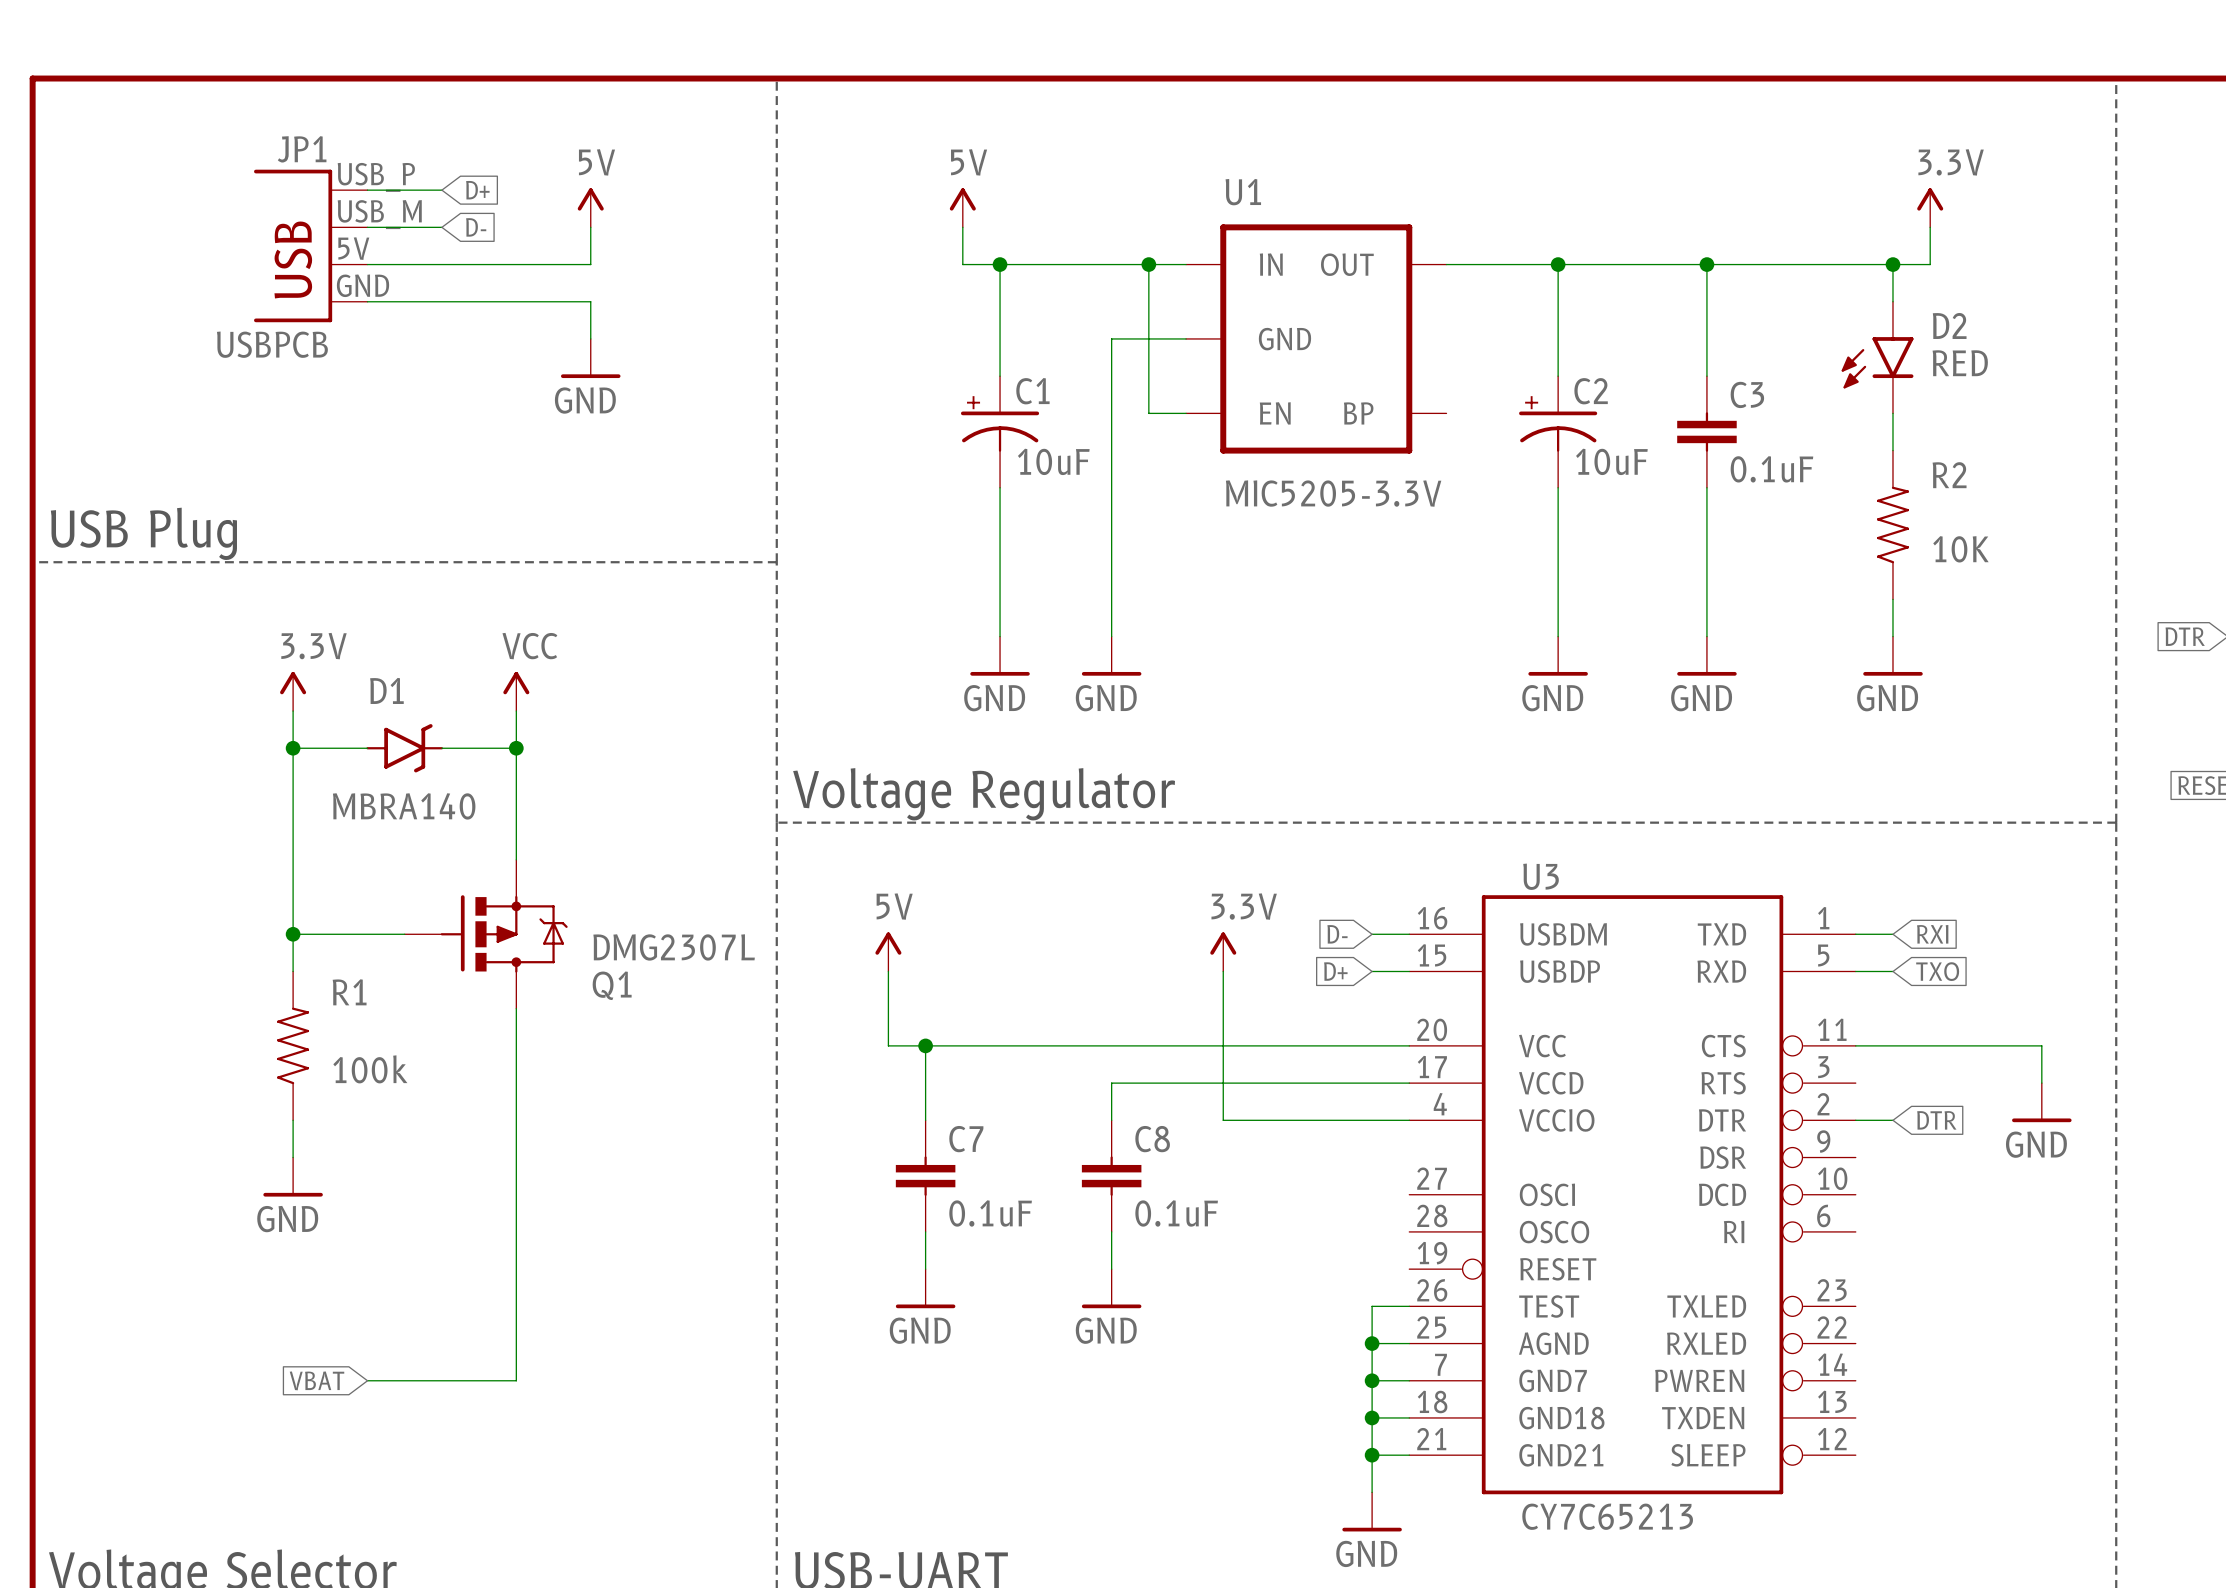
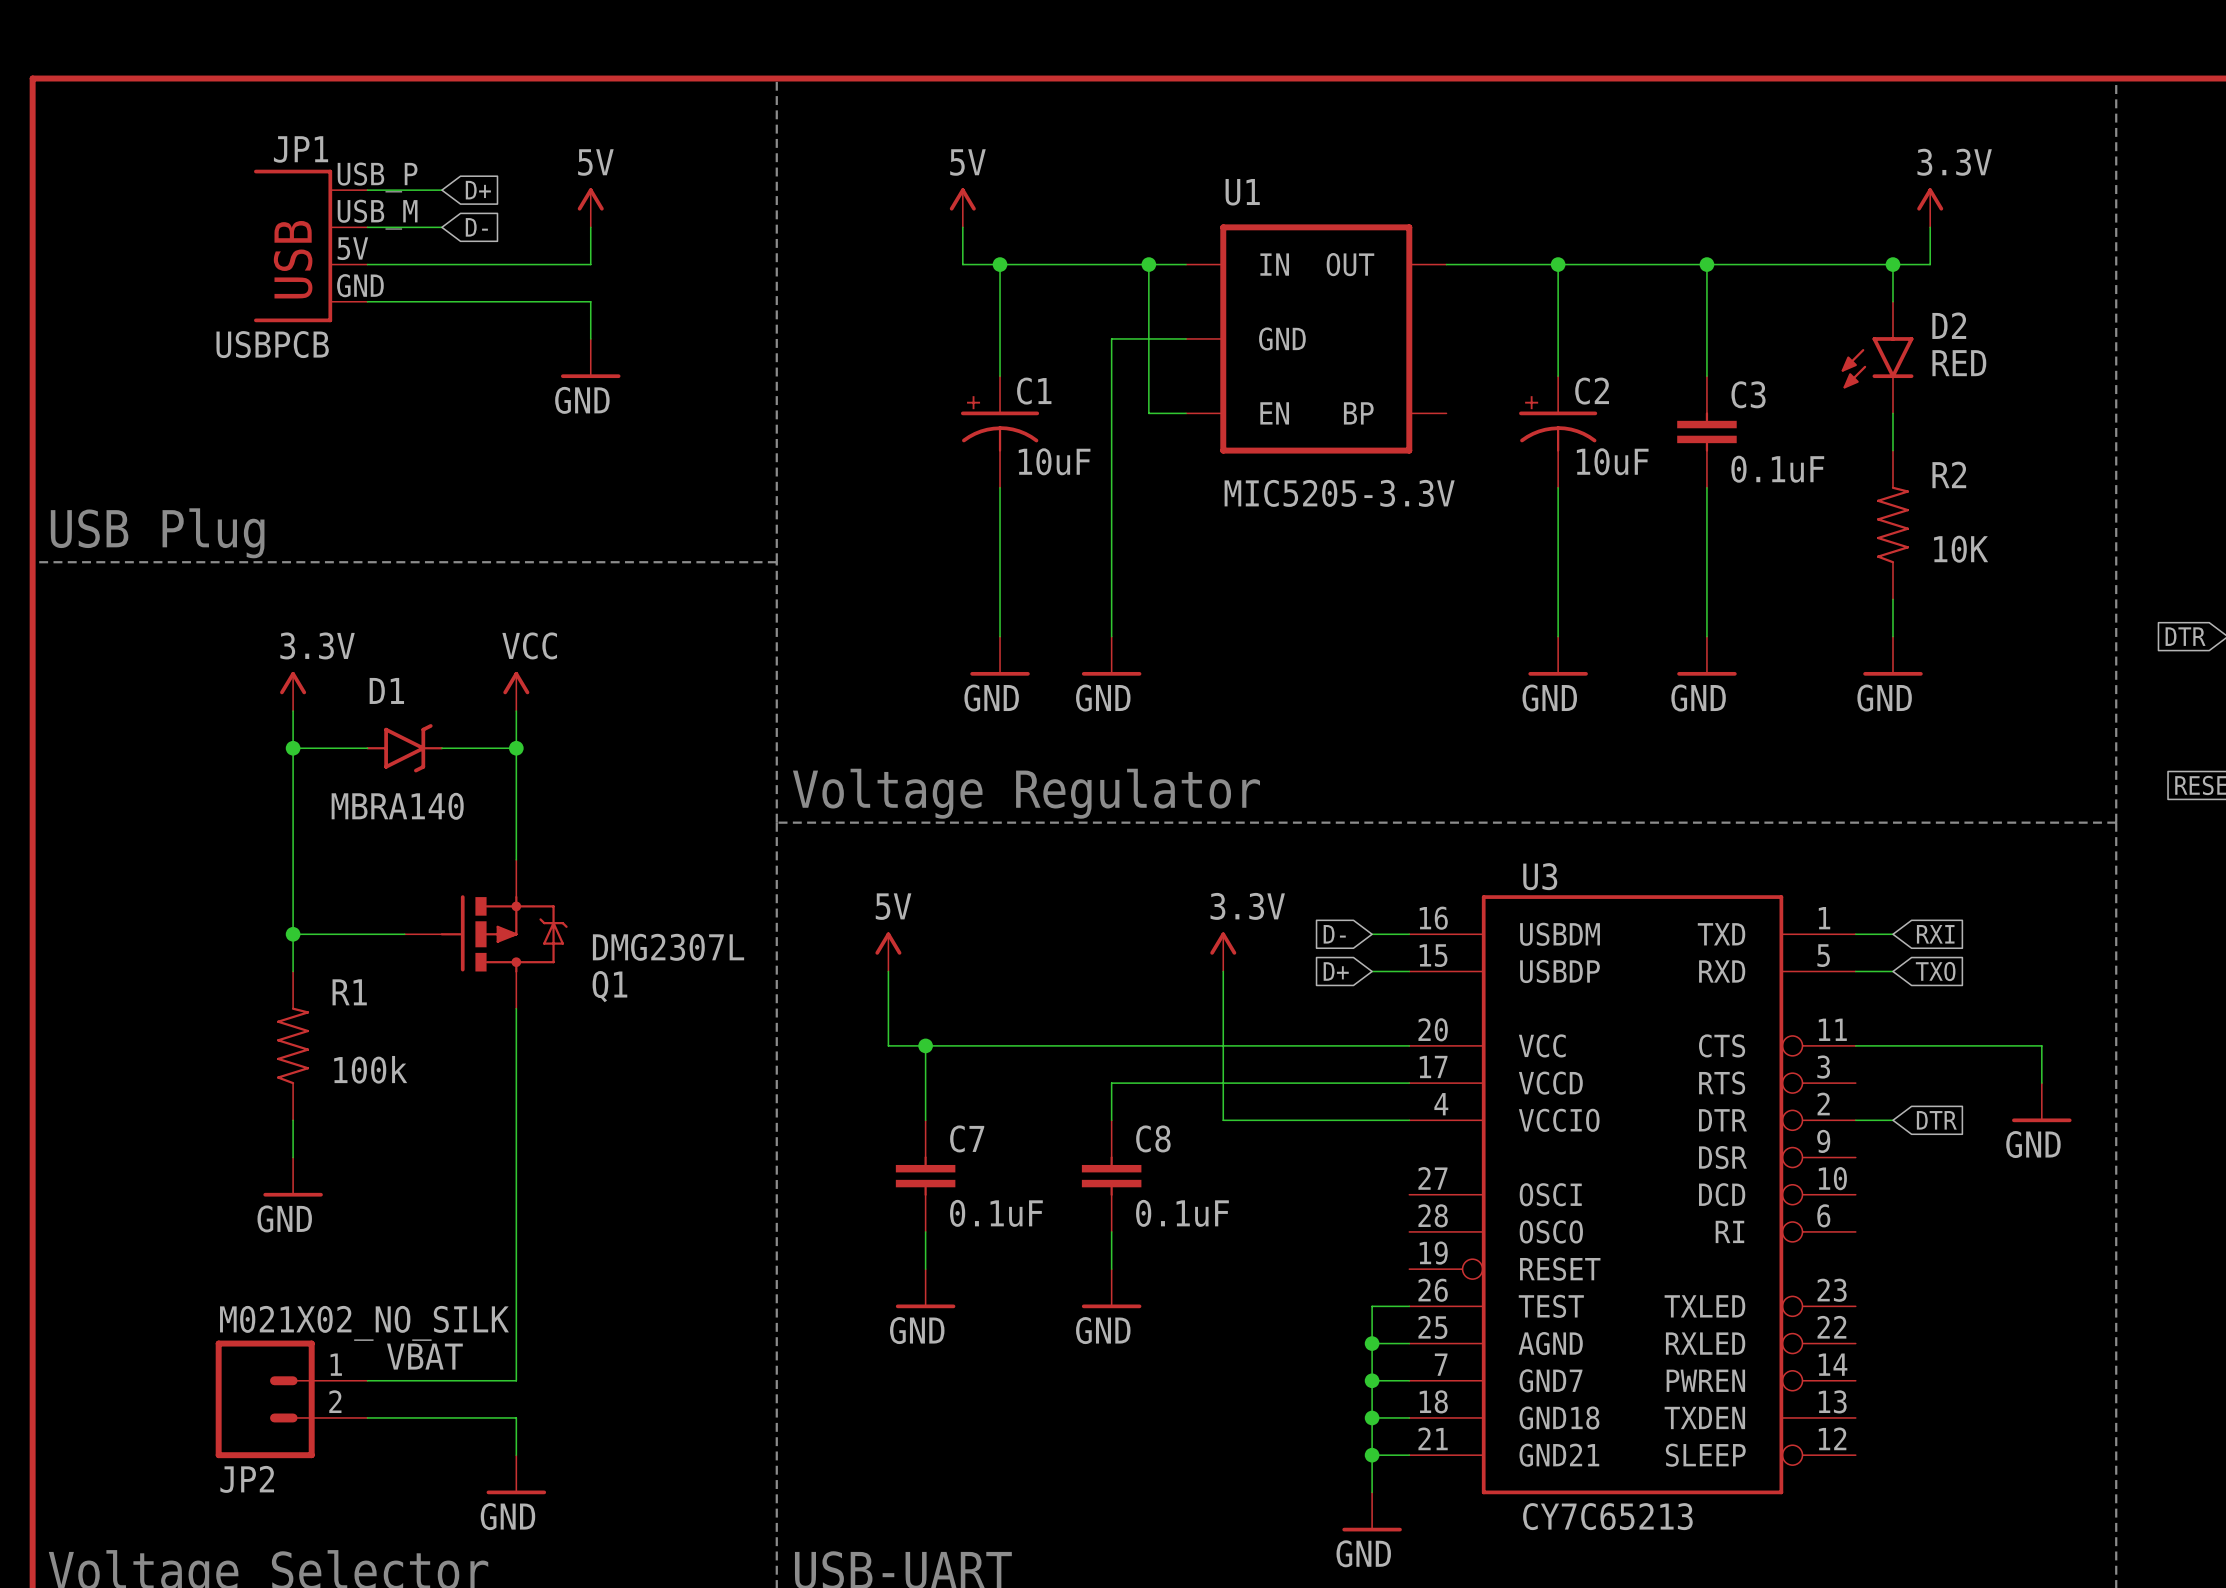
label: none -> VBAT (424, 1356)
global label: VBAT (316, 1380) -> none
JP2: none -> M021X02_NO_SILK (291, 1399)
wire: none -> (367, 1417) (516, 1417) (516, 1455)
power symbol: none -> GND (516, 1474)

